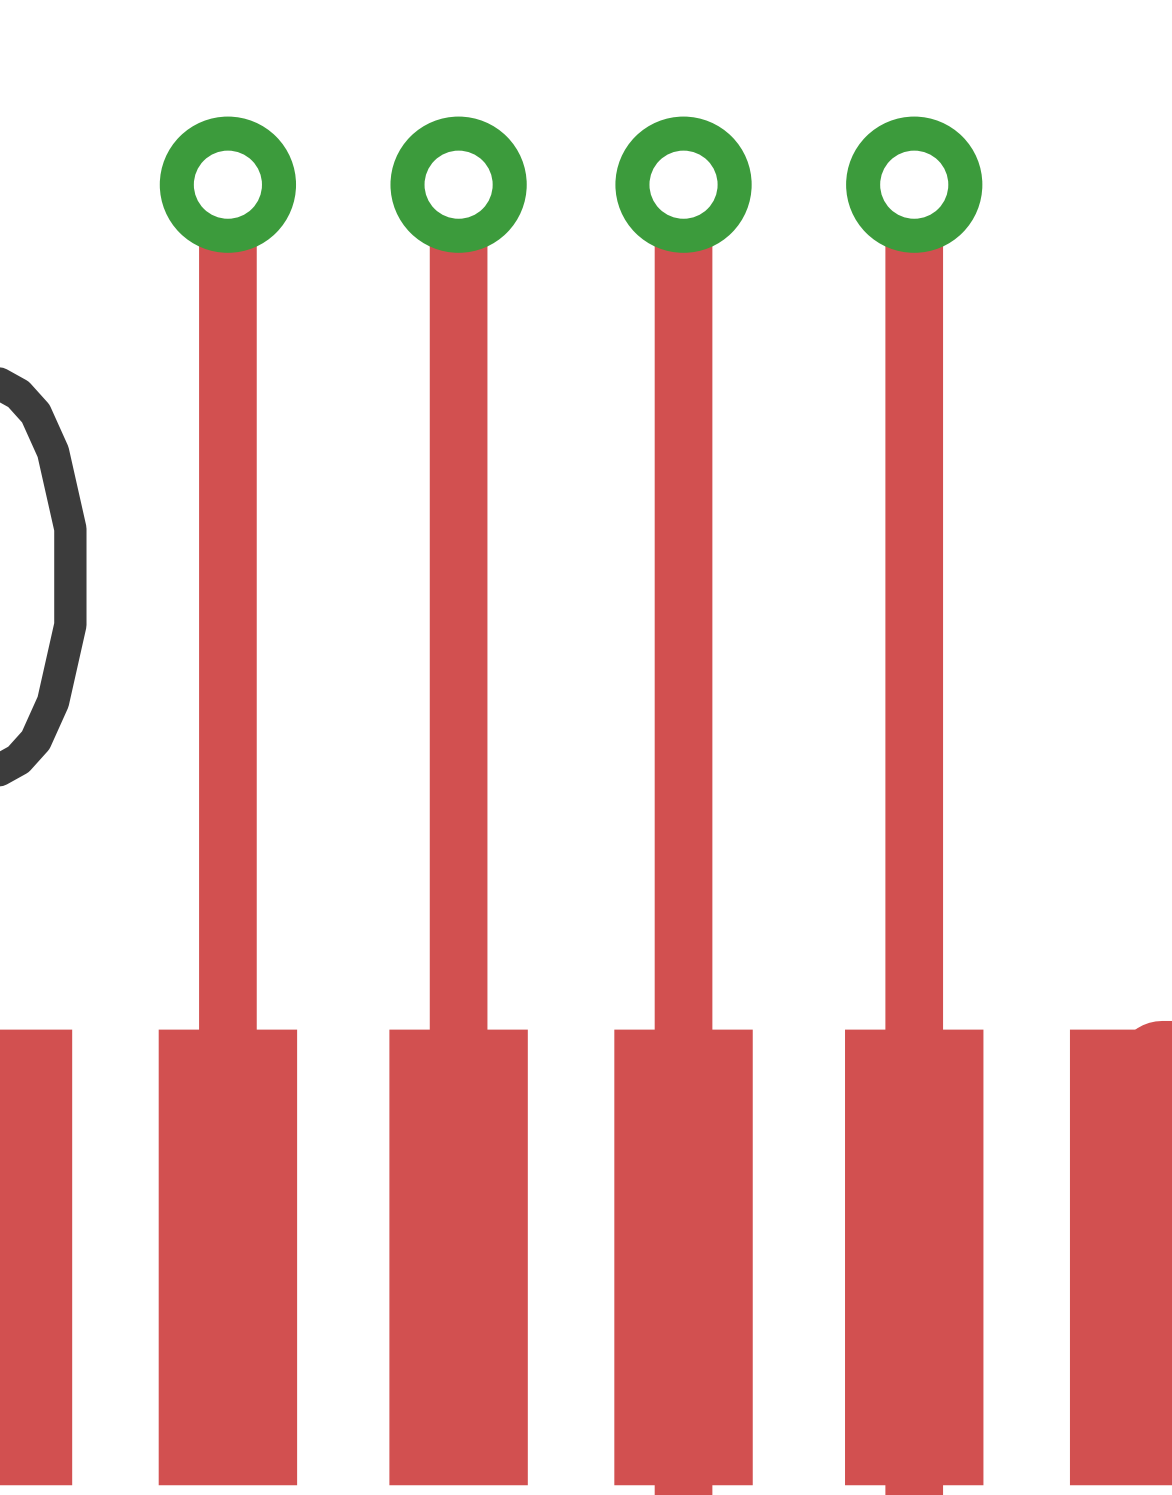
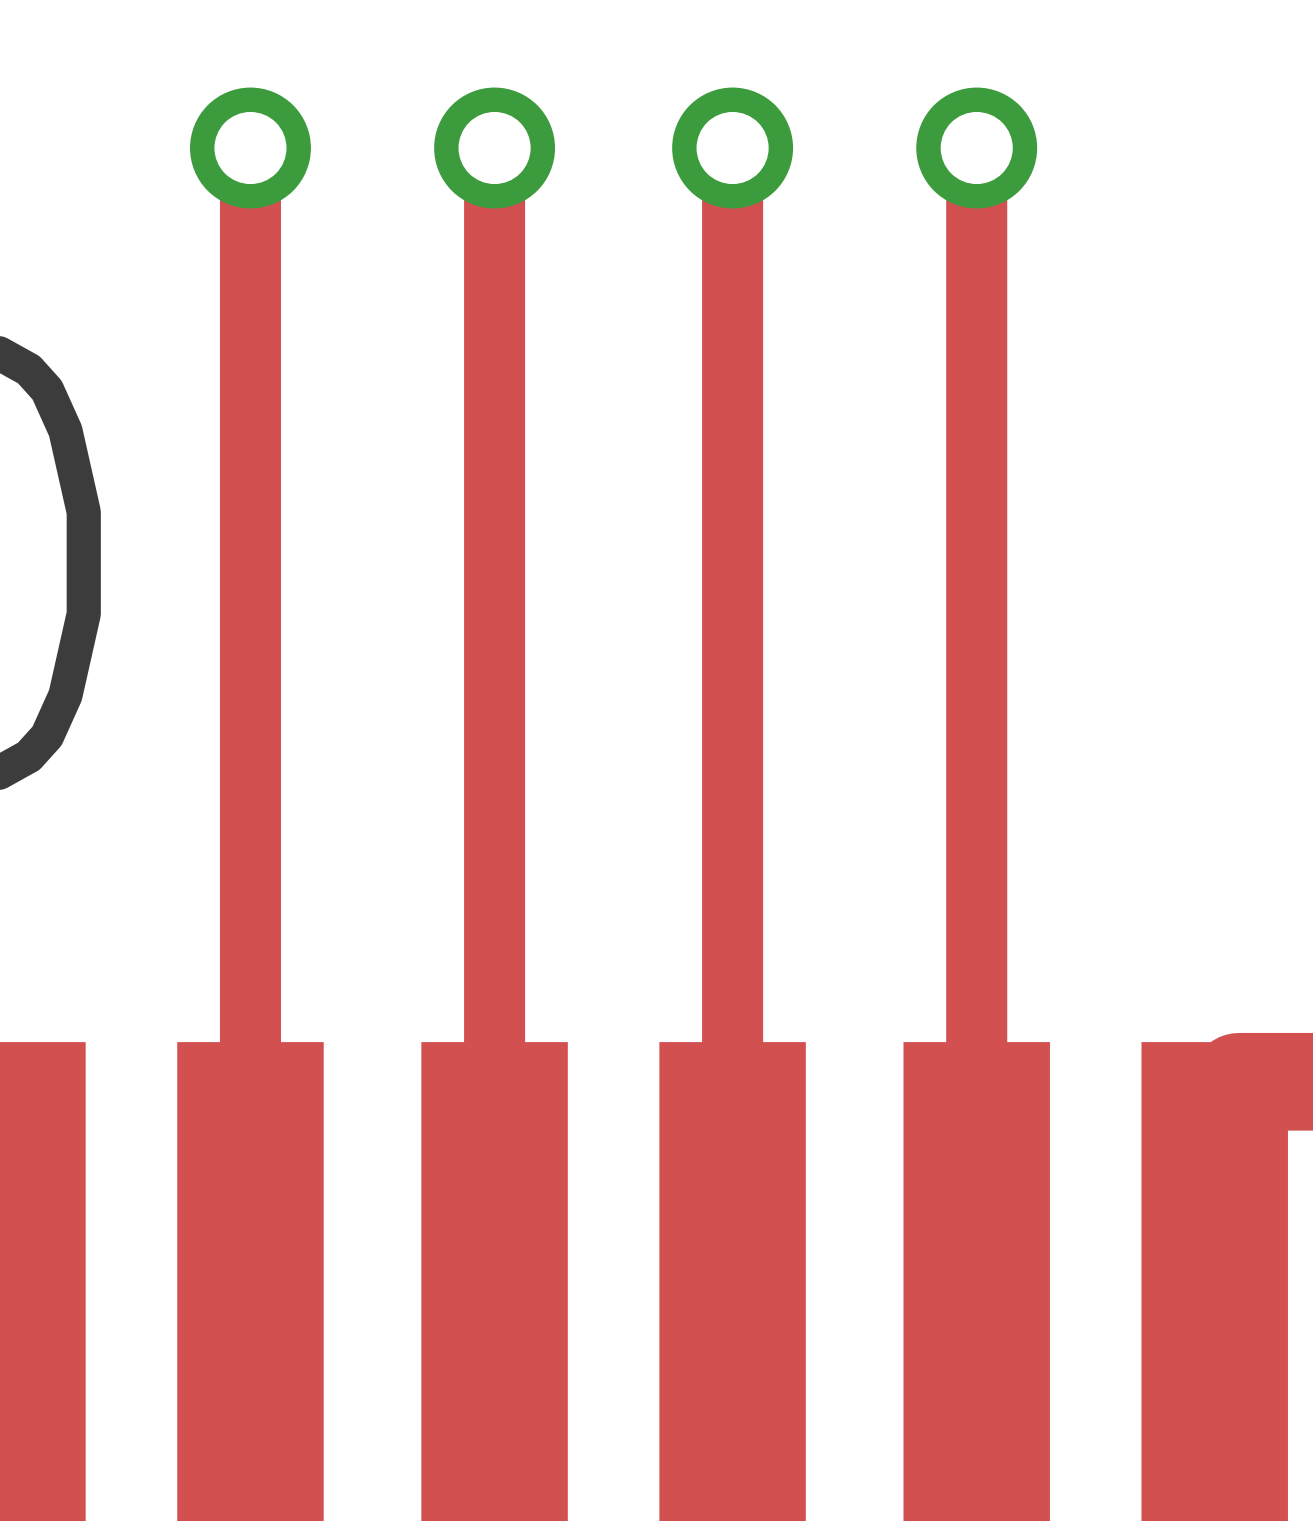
via size: [159, 116, 297, 253] -> [190, 87, 311, 209]
via size: [390, 116, 527, 253] -> [434, 87, 556, 209]
via size: [615, 116, 752, 253] -> [672, 87, 794, 209]
via size: [846, 116, 983, 253] -> [916, 87, 1038, 209]

